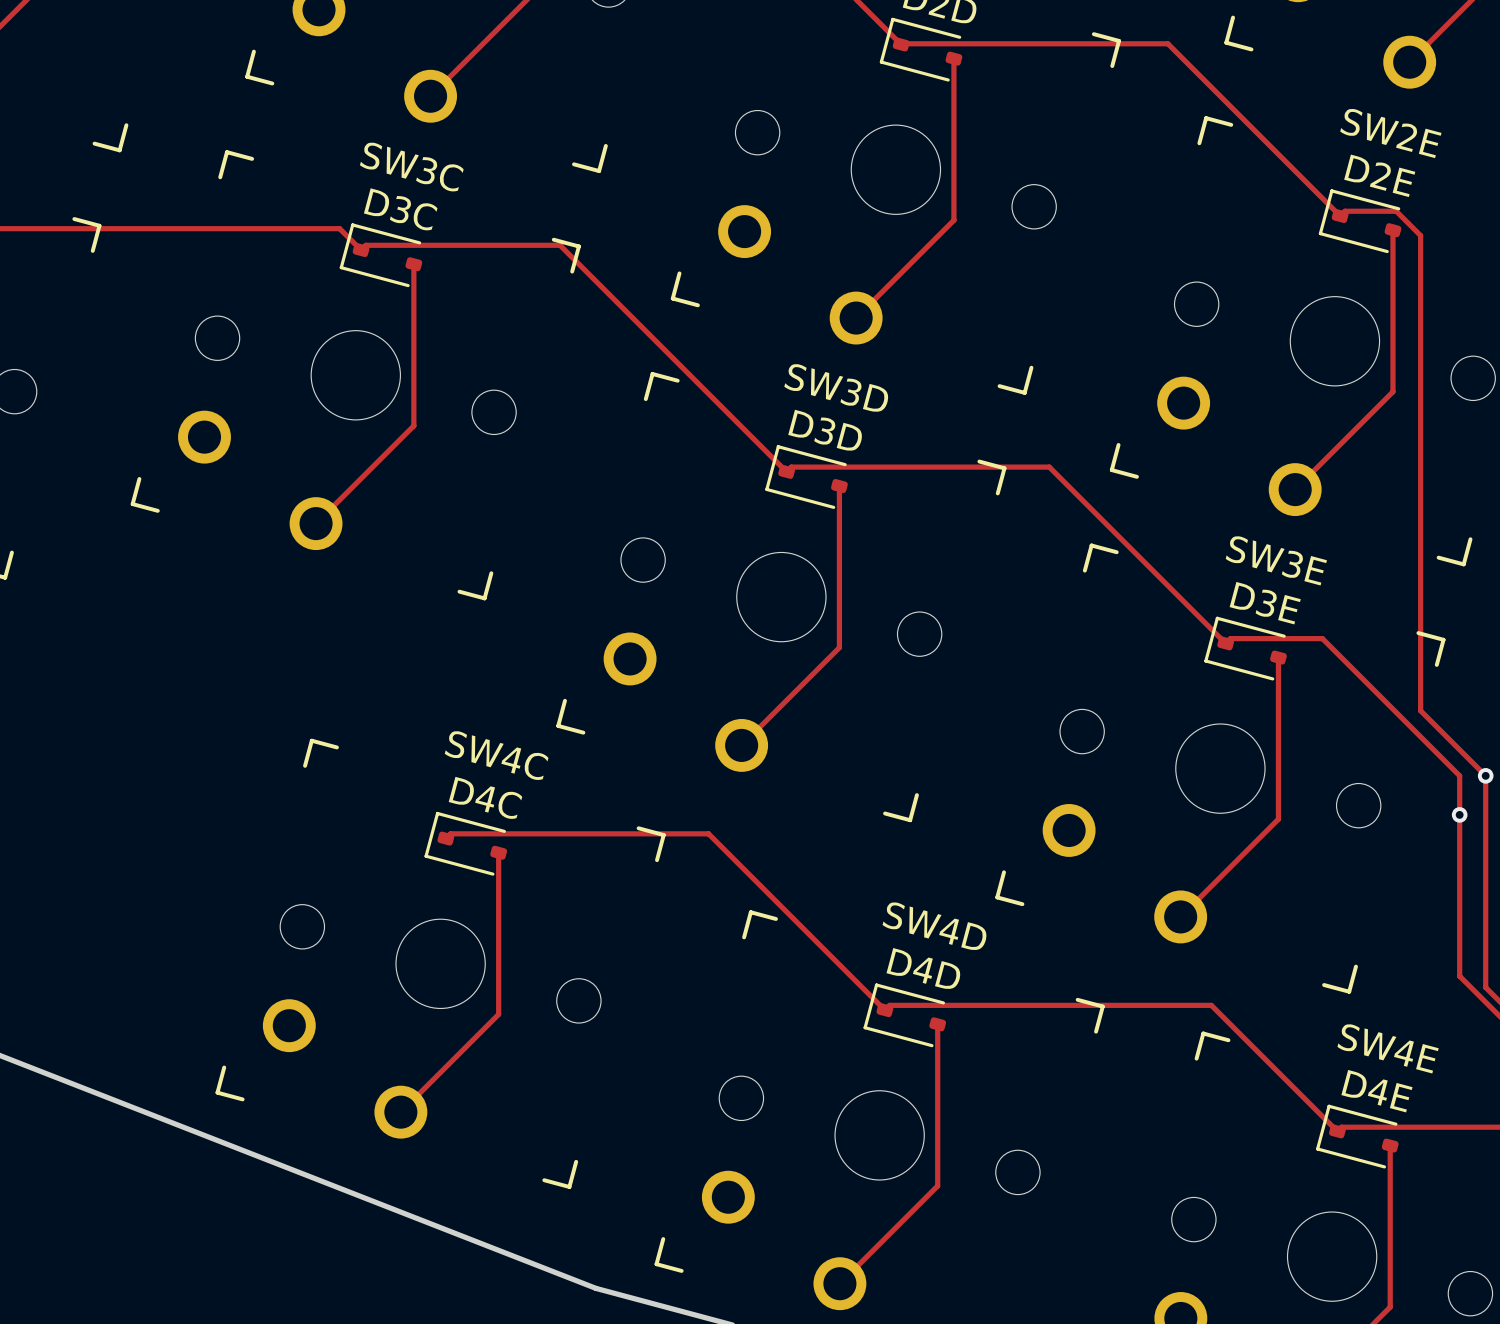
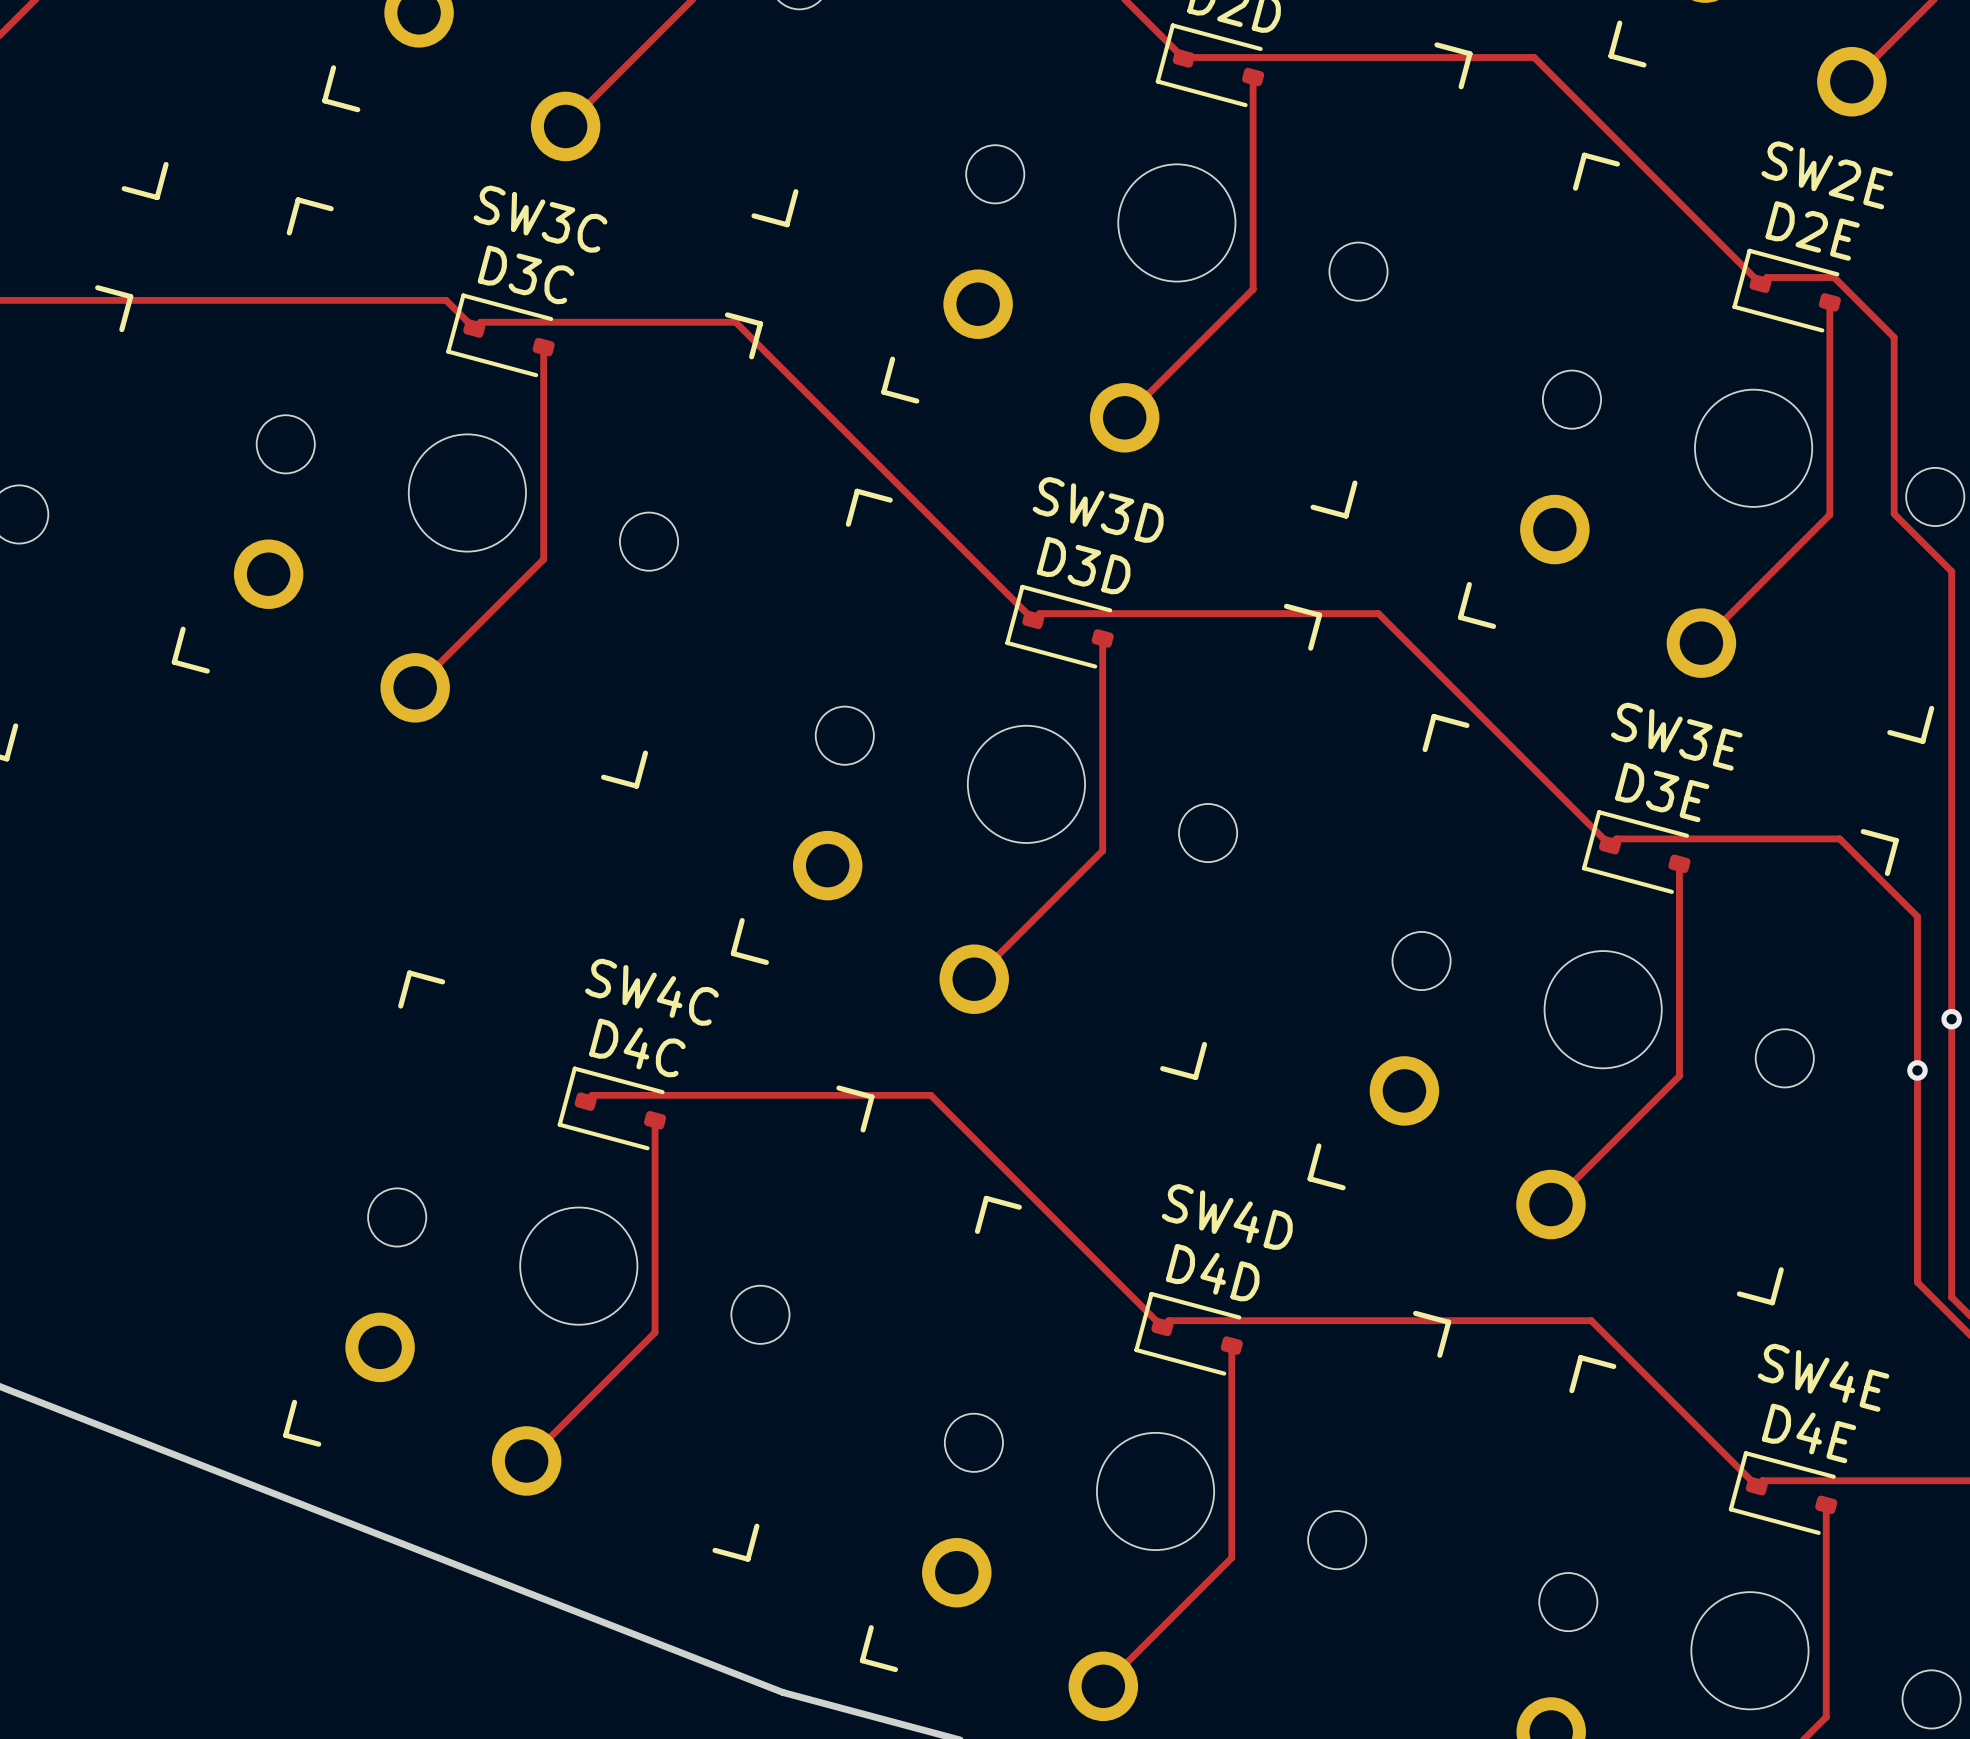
track: (1420, 235) (1420, 710) (1485, 775) -> (1866, 309) (1894, 337) (1894, 513) (1951, 571) (1951, 1019)
track: (1322, 638) (1459, 775) -> (1737, 838) (1839, 838) (1917, 916) (1917, 1019)

